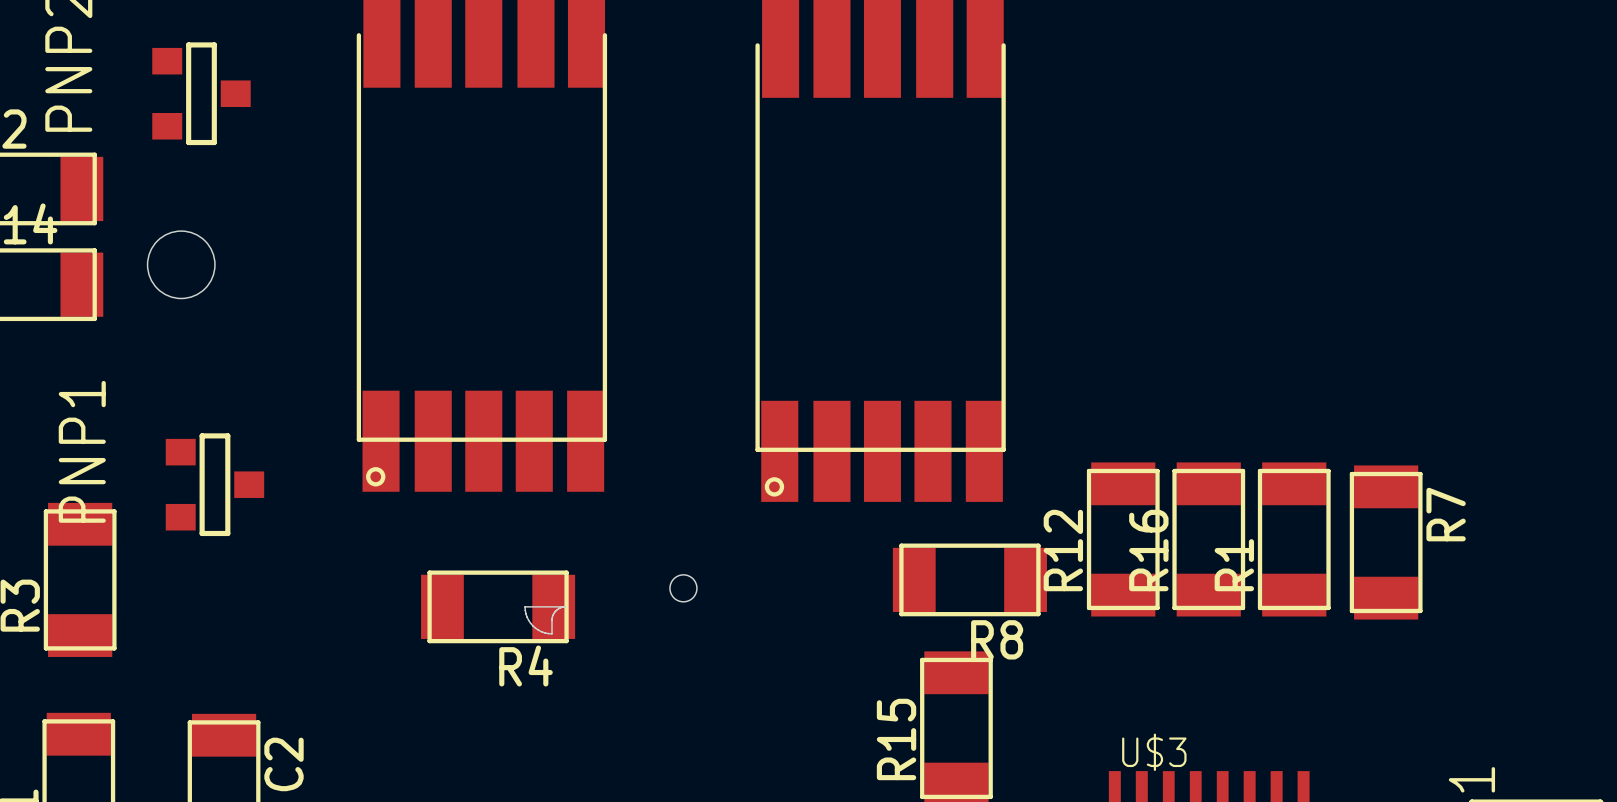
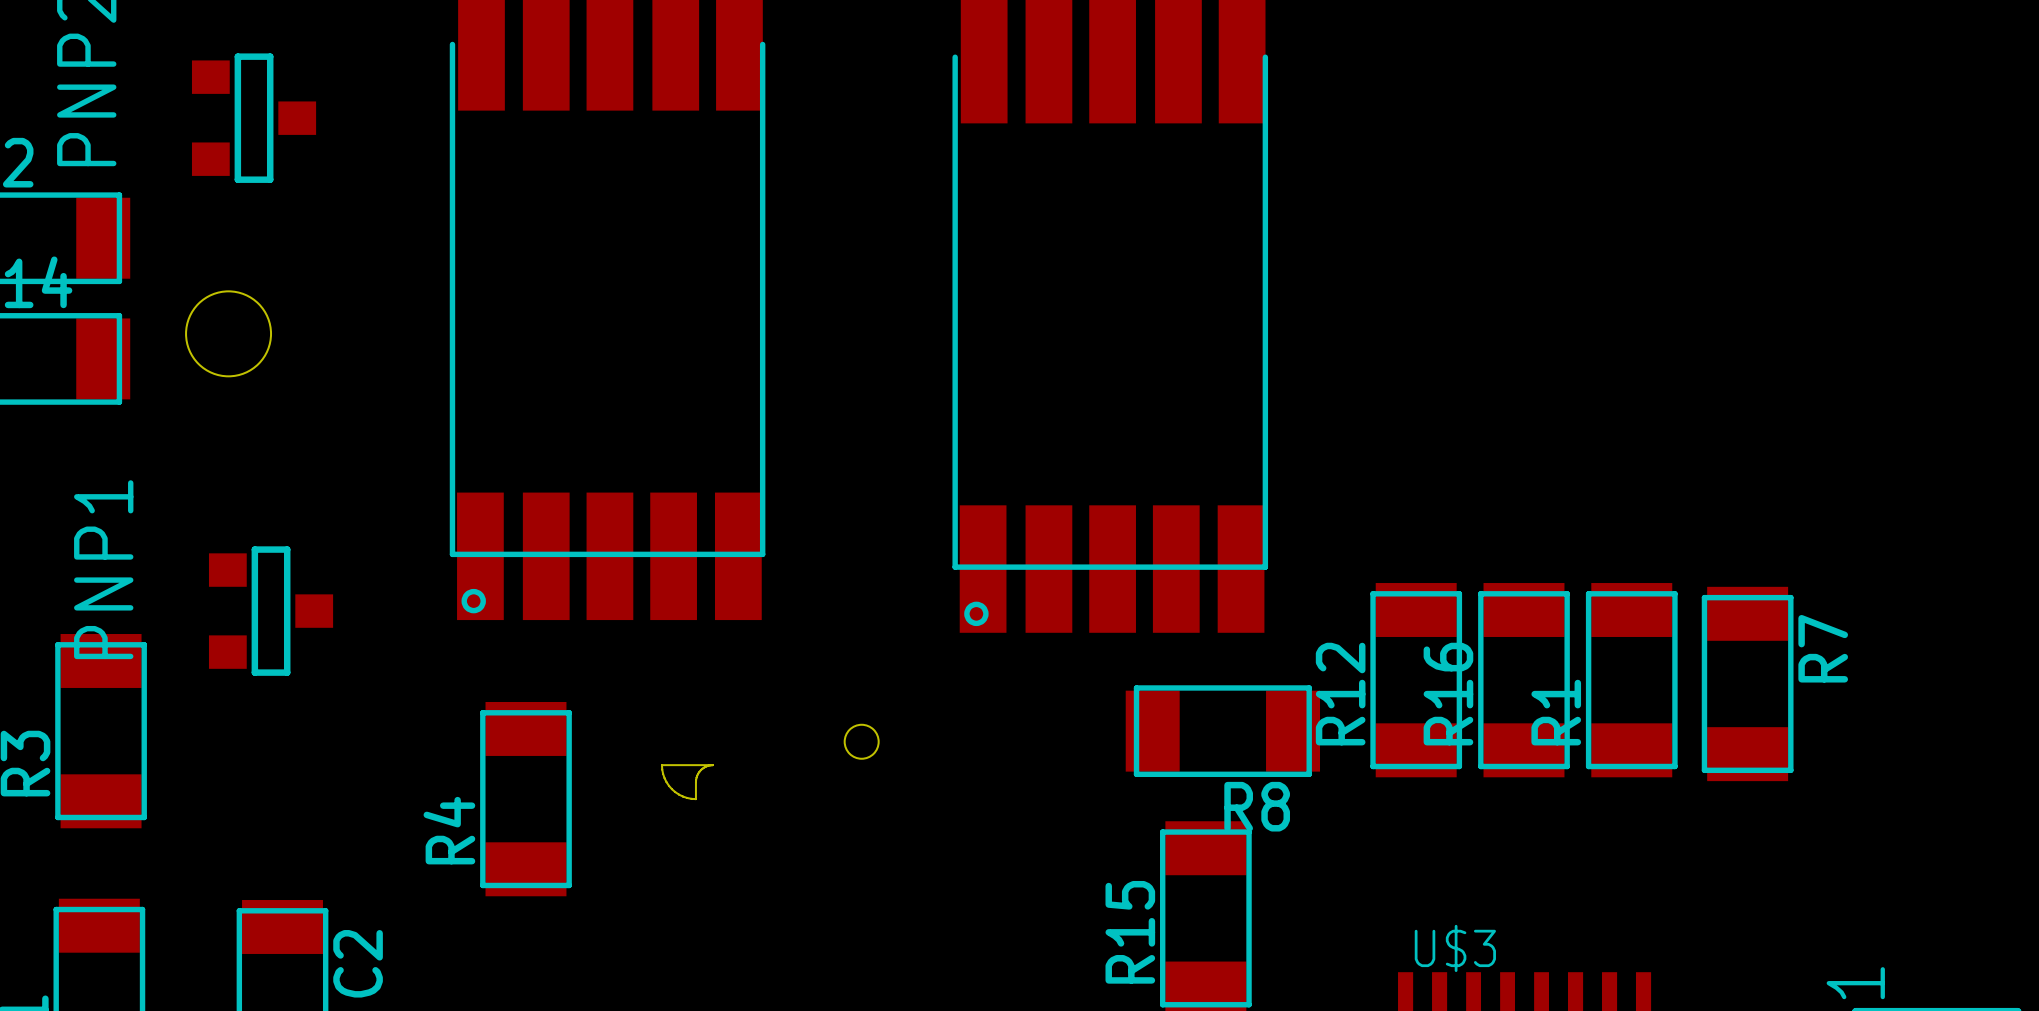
R4 rotation: 0° (498, 606) -> 90° clockwise (525, 799)

